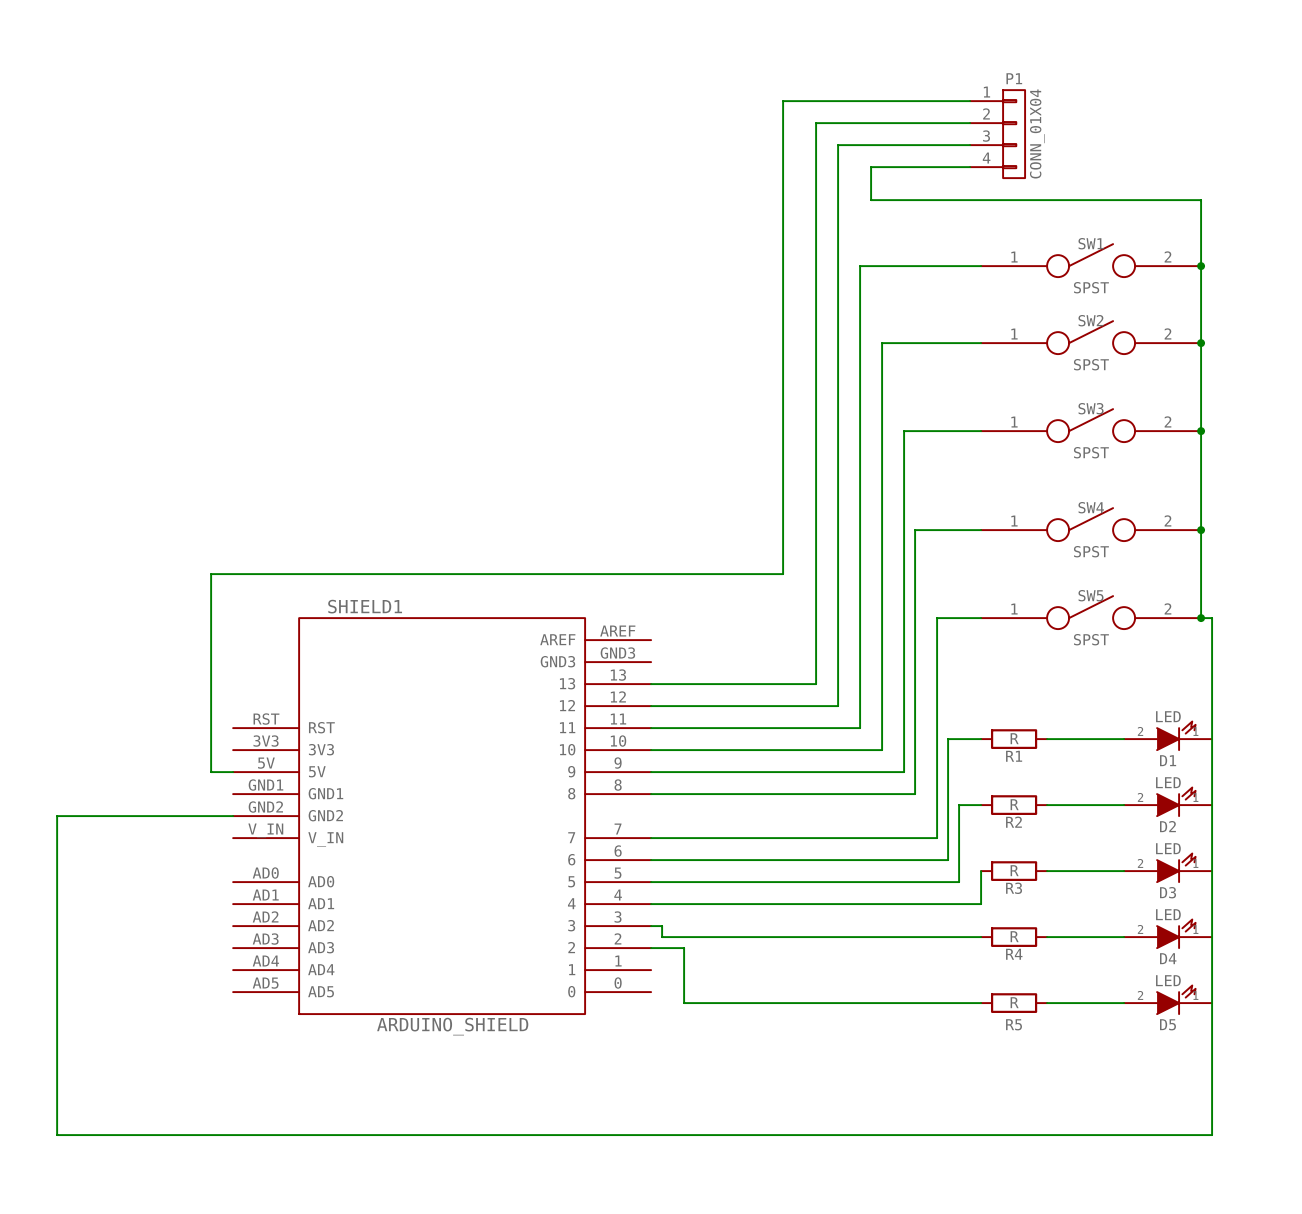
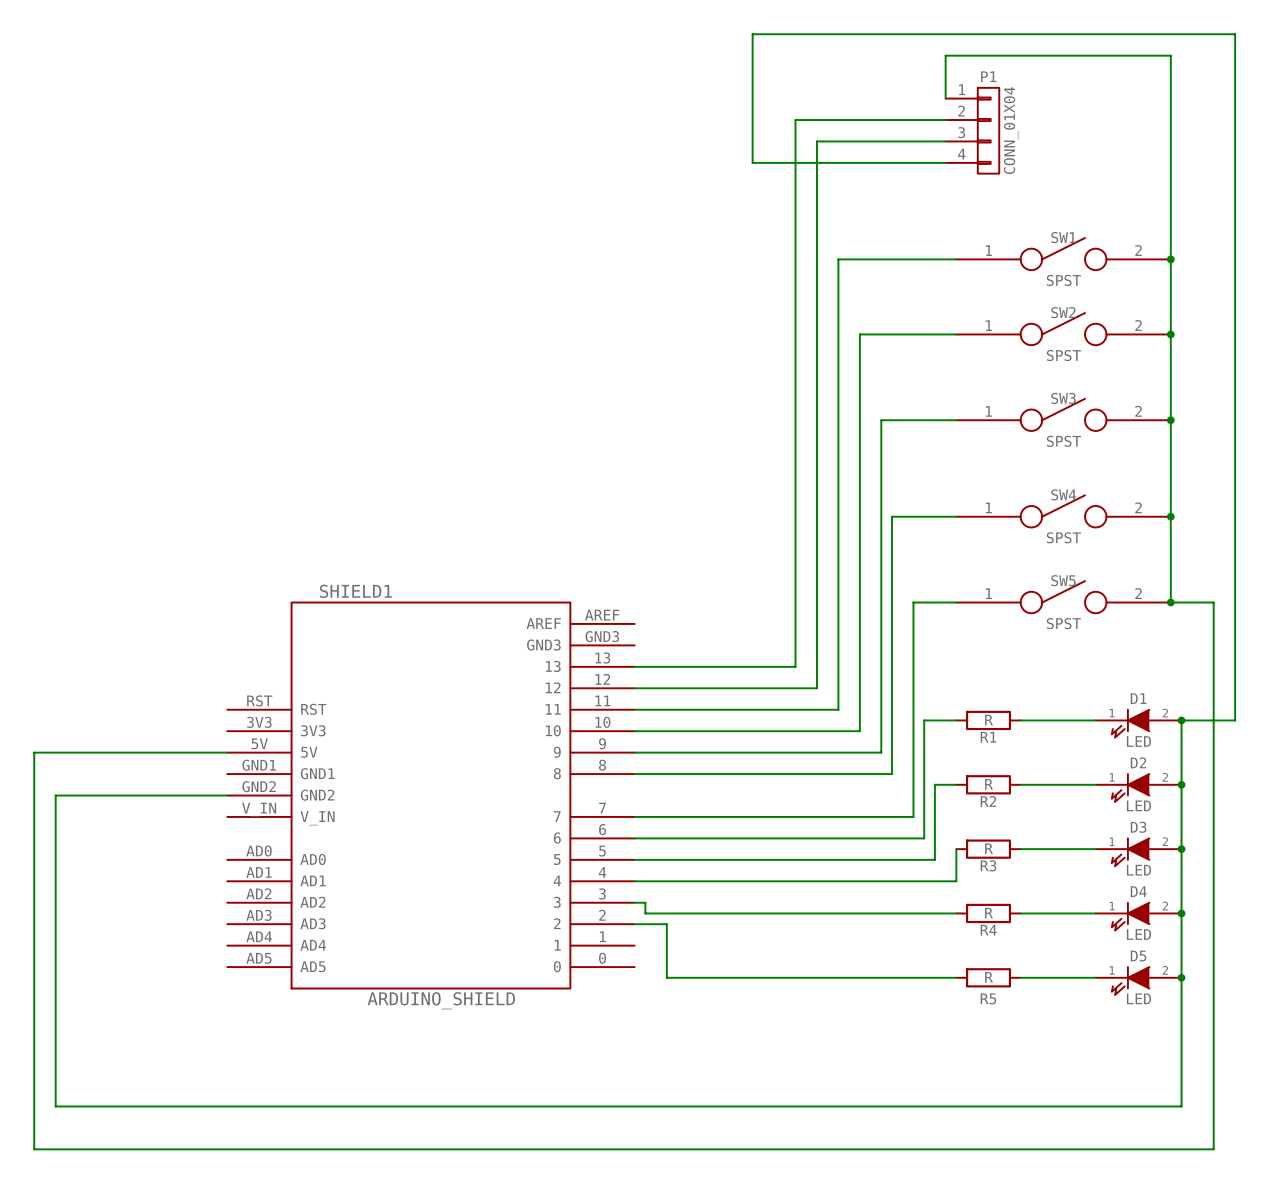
wire: (970, 101) (783, 101) (783, 574) (211, 574) (211, 772) -> (1181, 602) (1213, 602) (1213, 1149) (34, 1149) (34, 752) (205, 752)
wire: (871, 167) (871, 200) (1201, 200) -> (945, 98) (945, 55) (1170, 55) (1170, 195)
wire: (1212, 618) (1212, 739) -> (849, 162) (752, 162) (752, 34) (1235, 34) (1235, 720) (1181, 720)
D1 rotation: 0° (1176, 735) -> 180° (1130, 723)
junction: none -> (1181, 720)
D2 rotation: 0° (1176, 801) -> 180° (1130, 788)
junction: none -> (1181, 784)
D3 rotation: 0° (1176, 867) -> 180° (1130, 852)
junction: none -> (1181, 849)
D4 rotation: 0° (1176, 933) -> 180° (1130, 916)
junction: none -> (1181, 913)
D5 rotation: 0° (1176, 999) -> 180° (1130, 981)
junction: none -> (1181, 977)

